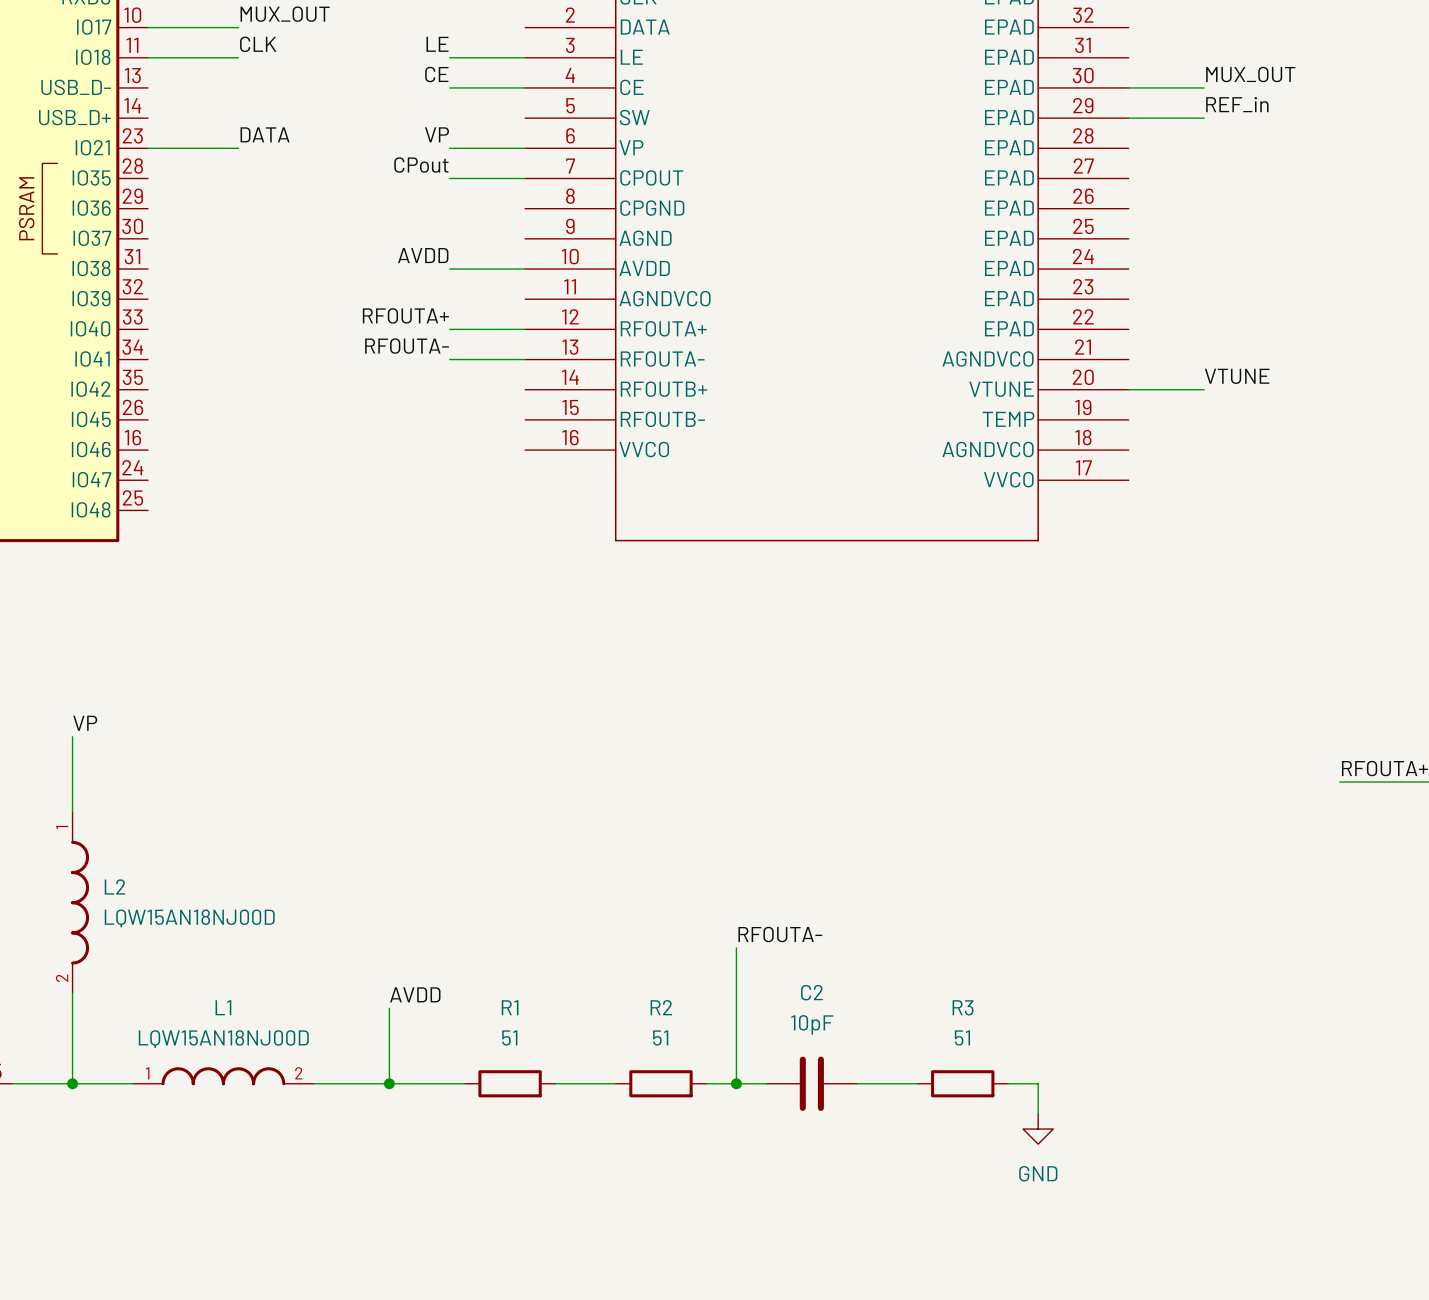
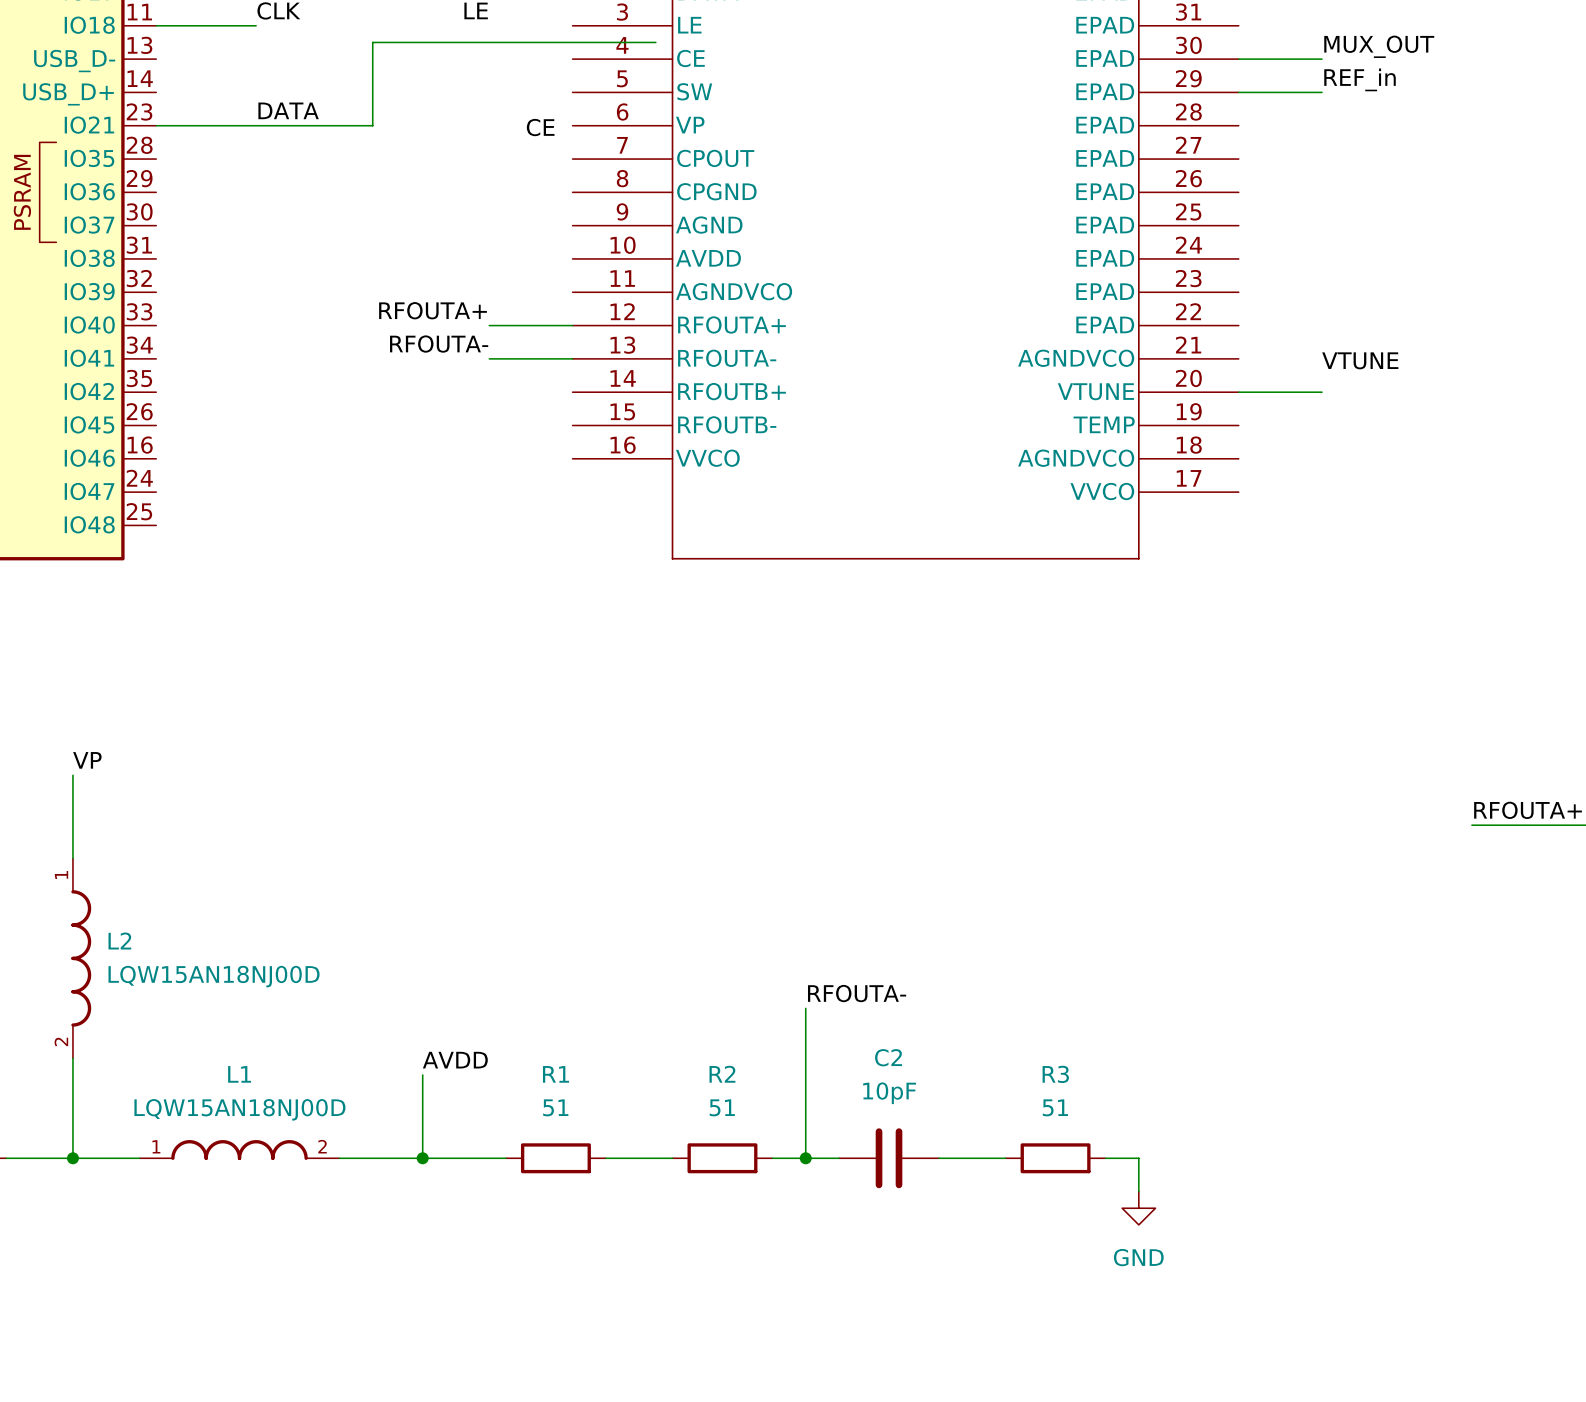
wire: (449, 57) (525, 57) -> none
wire: none -> (655, 42) (372, 42) (372, 125) (256, 125)
label position: CE (436, 74) -> CE (540, 127)
wire: (449, 87) (525, 87) -> none
label: VP (436, 134) -> none
wire: (449, 148) (525, 148) -> none
label: CPout (421, 165) -> none
wire: (449, 178) (525, 178) -> none
label: AVDD (423, 255) -> none
wire: (449, 269) (525, 269) -> none
label position: VTUNE (1237, 376) -> VTUNE (1360, 360)

